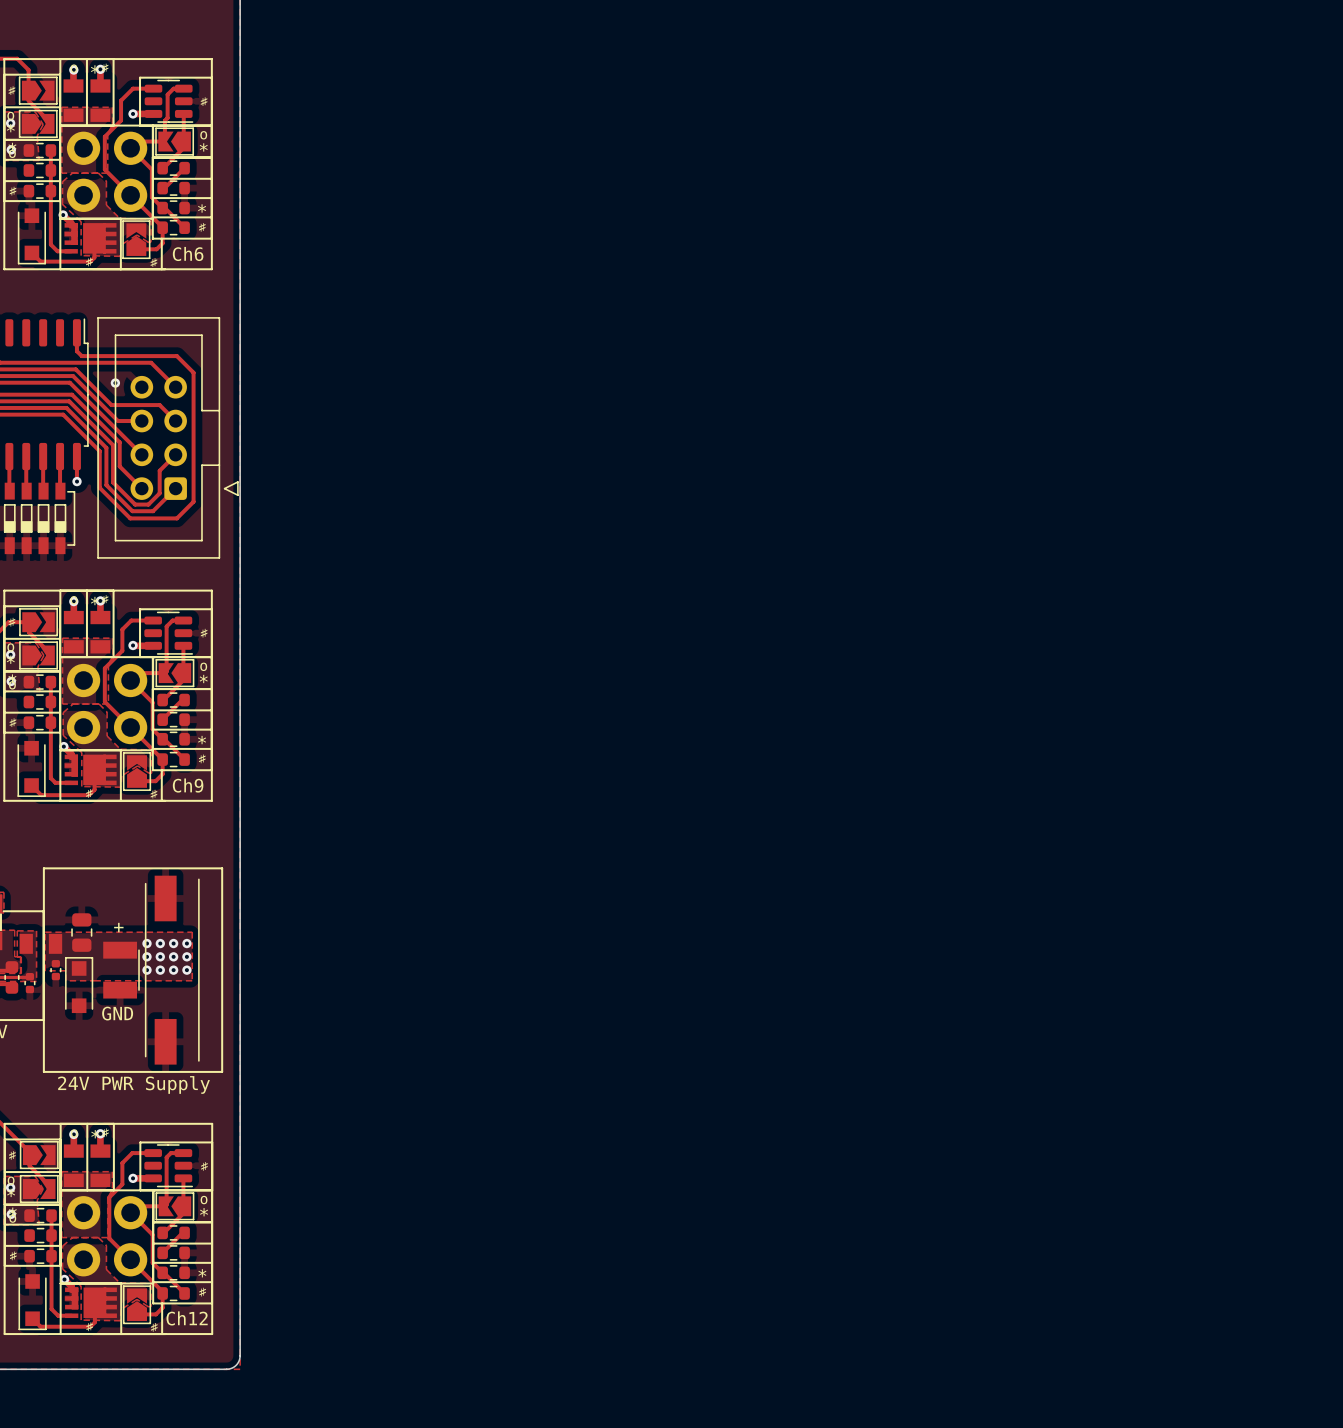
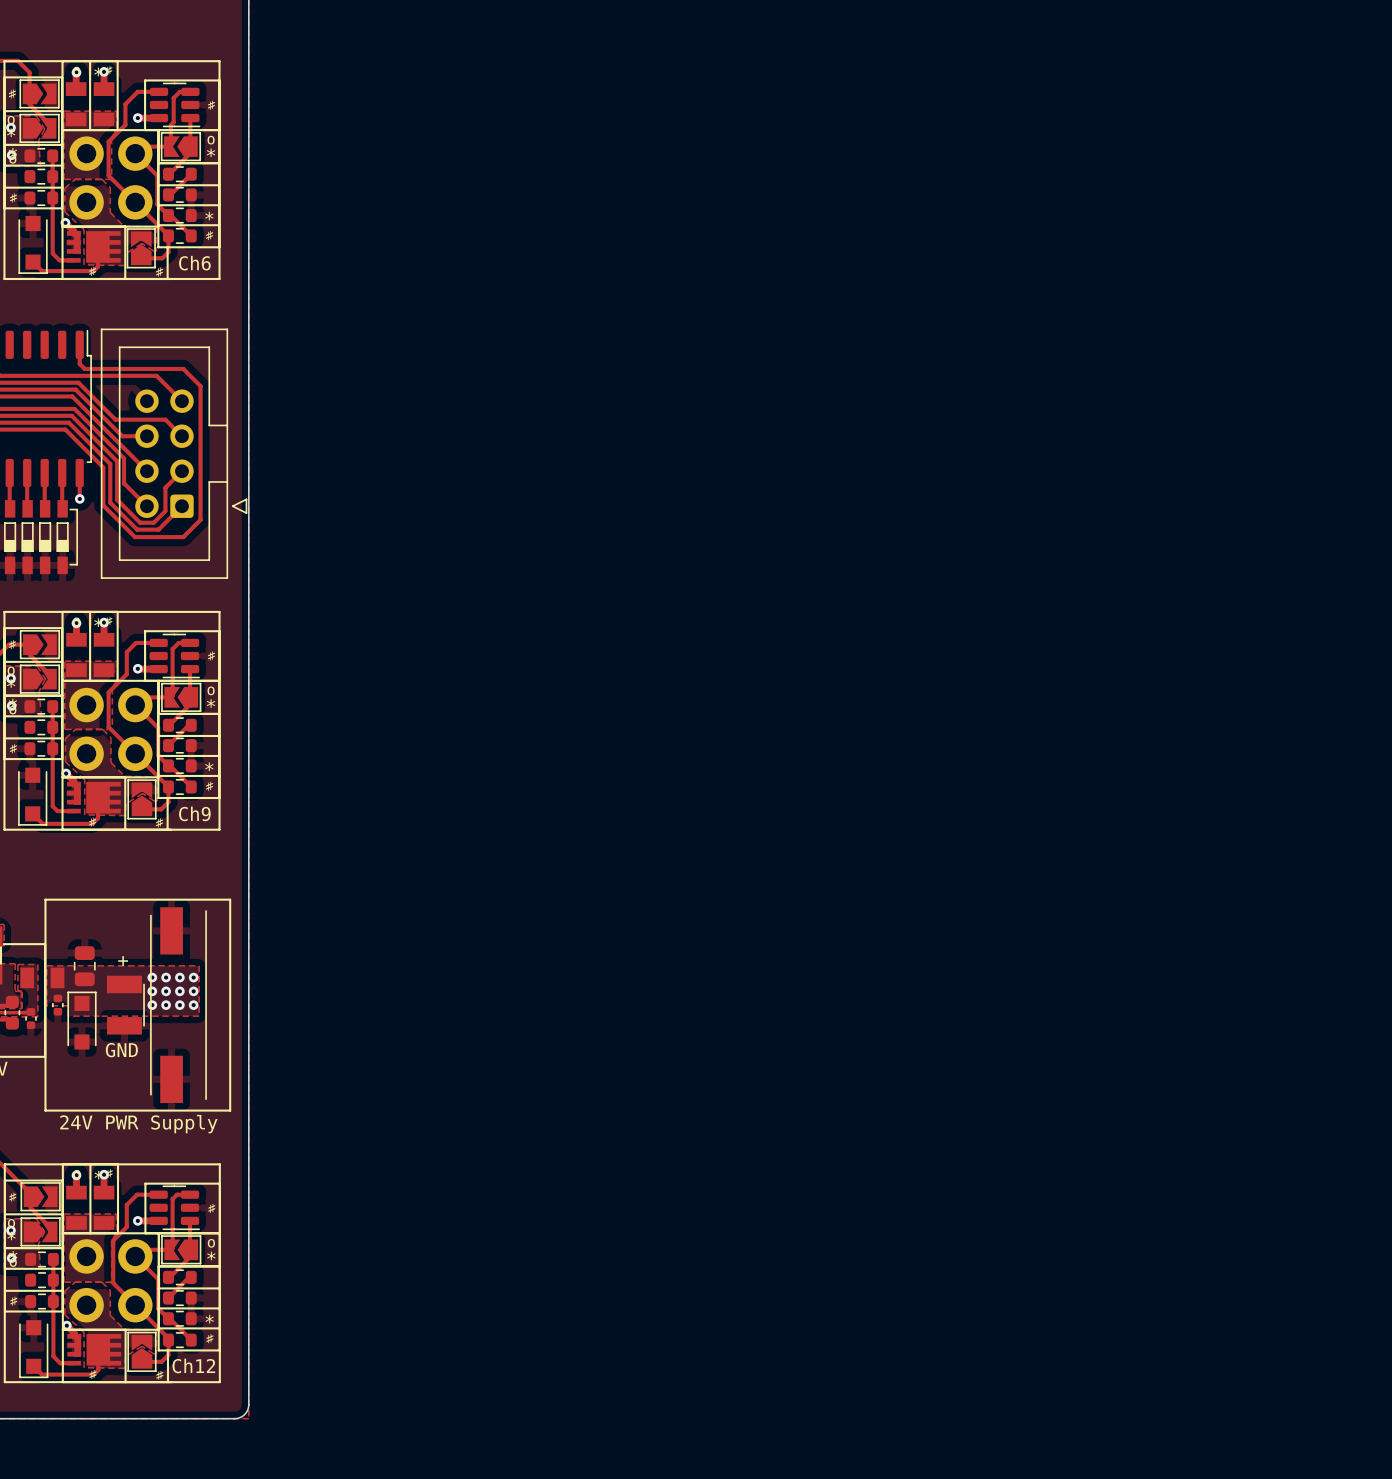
via: (115, 383) -> none

